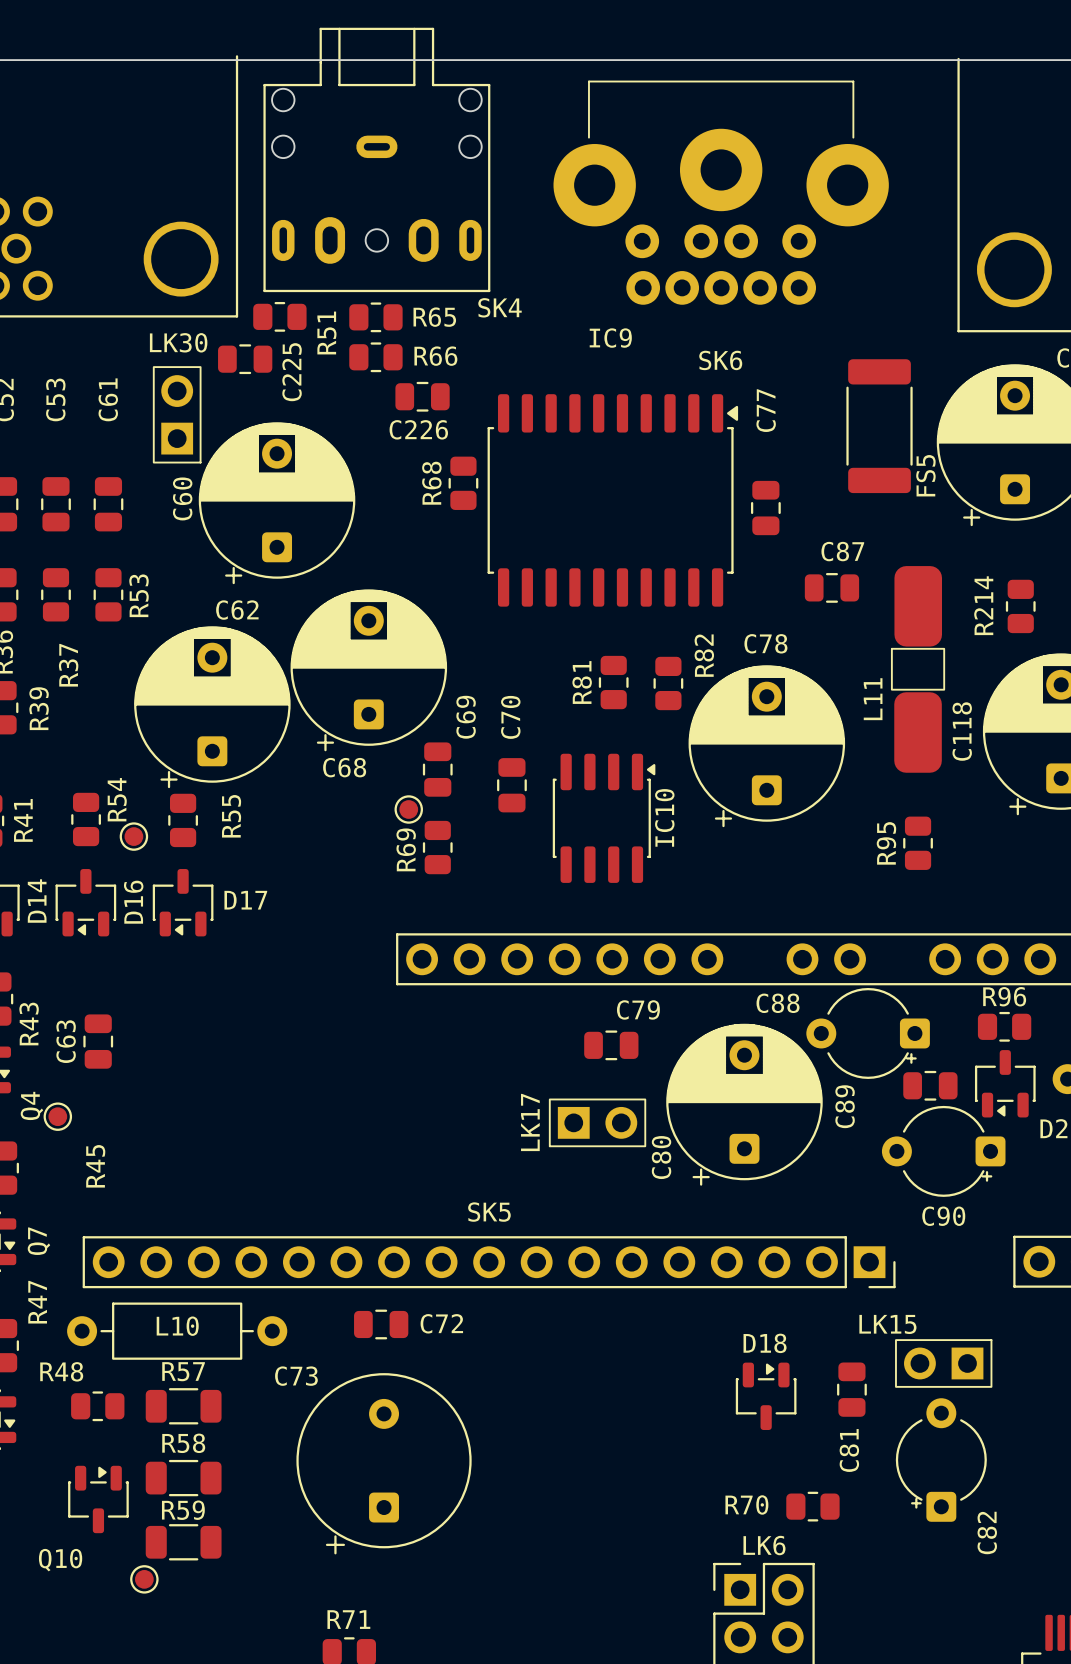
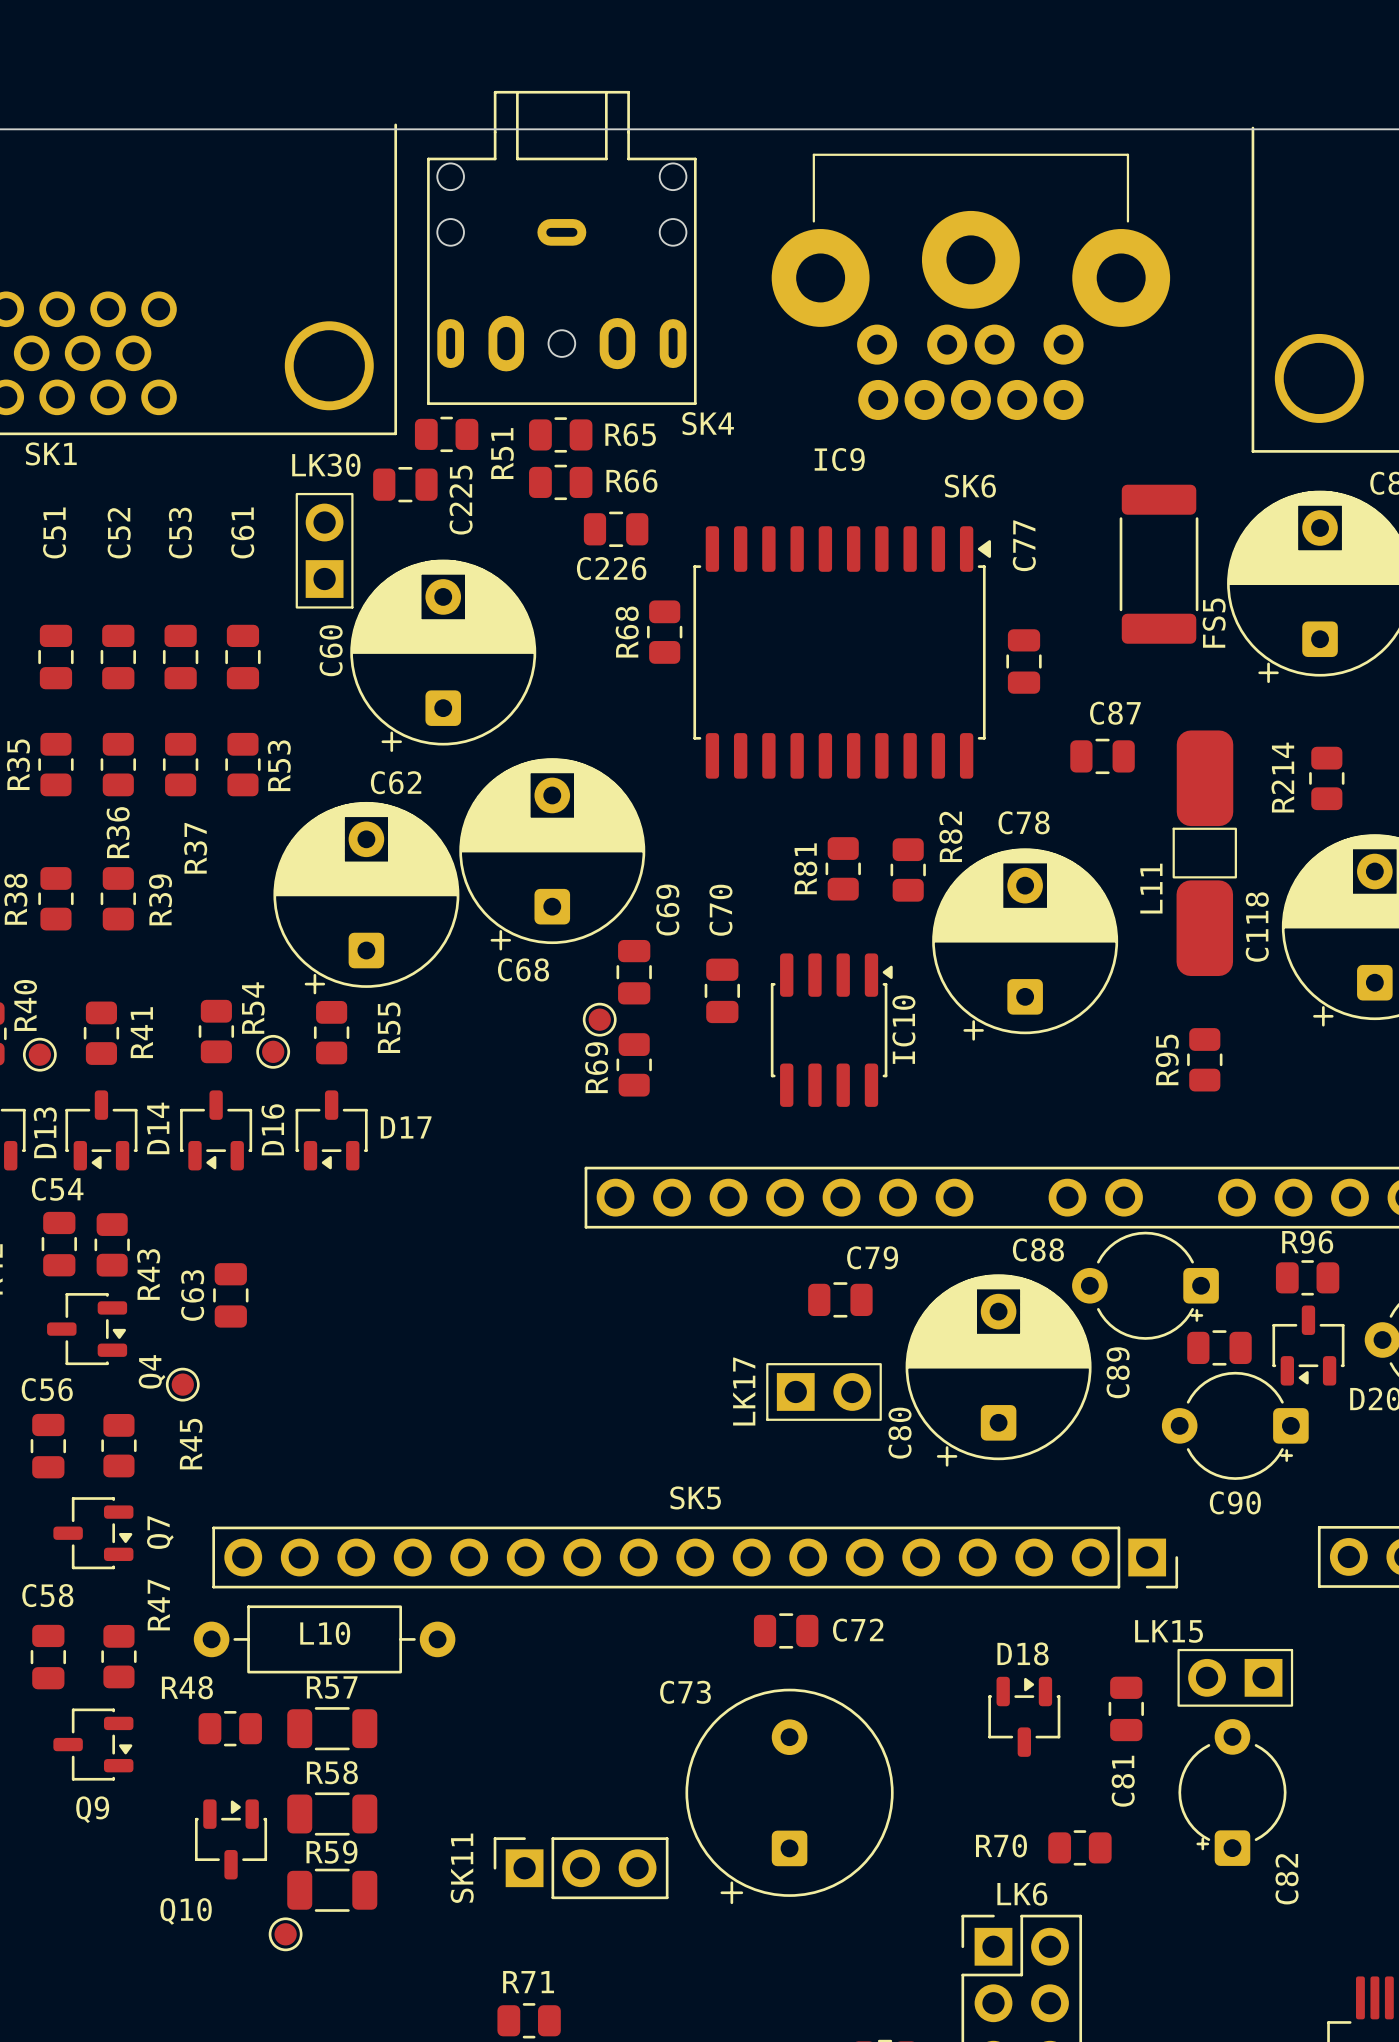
R45 name position: R45 (95, 1166) -> R45 (191, 1444)
C72 position: (381, 1324) -> (786, 1630)
C73 position: (384, 1463) -> (789, 1796)
SK11: none -> (581, 1868)

